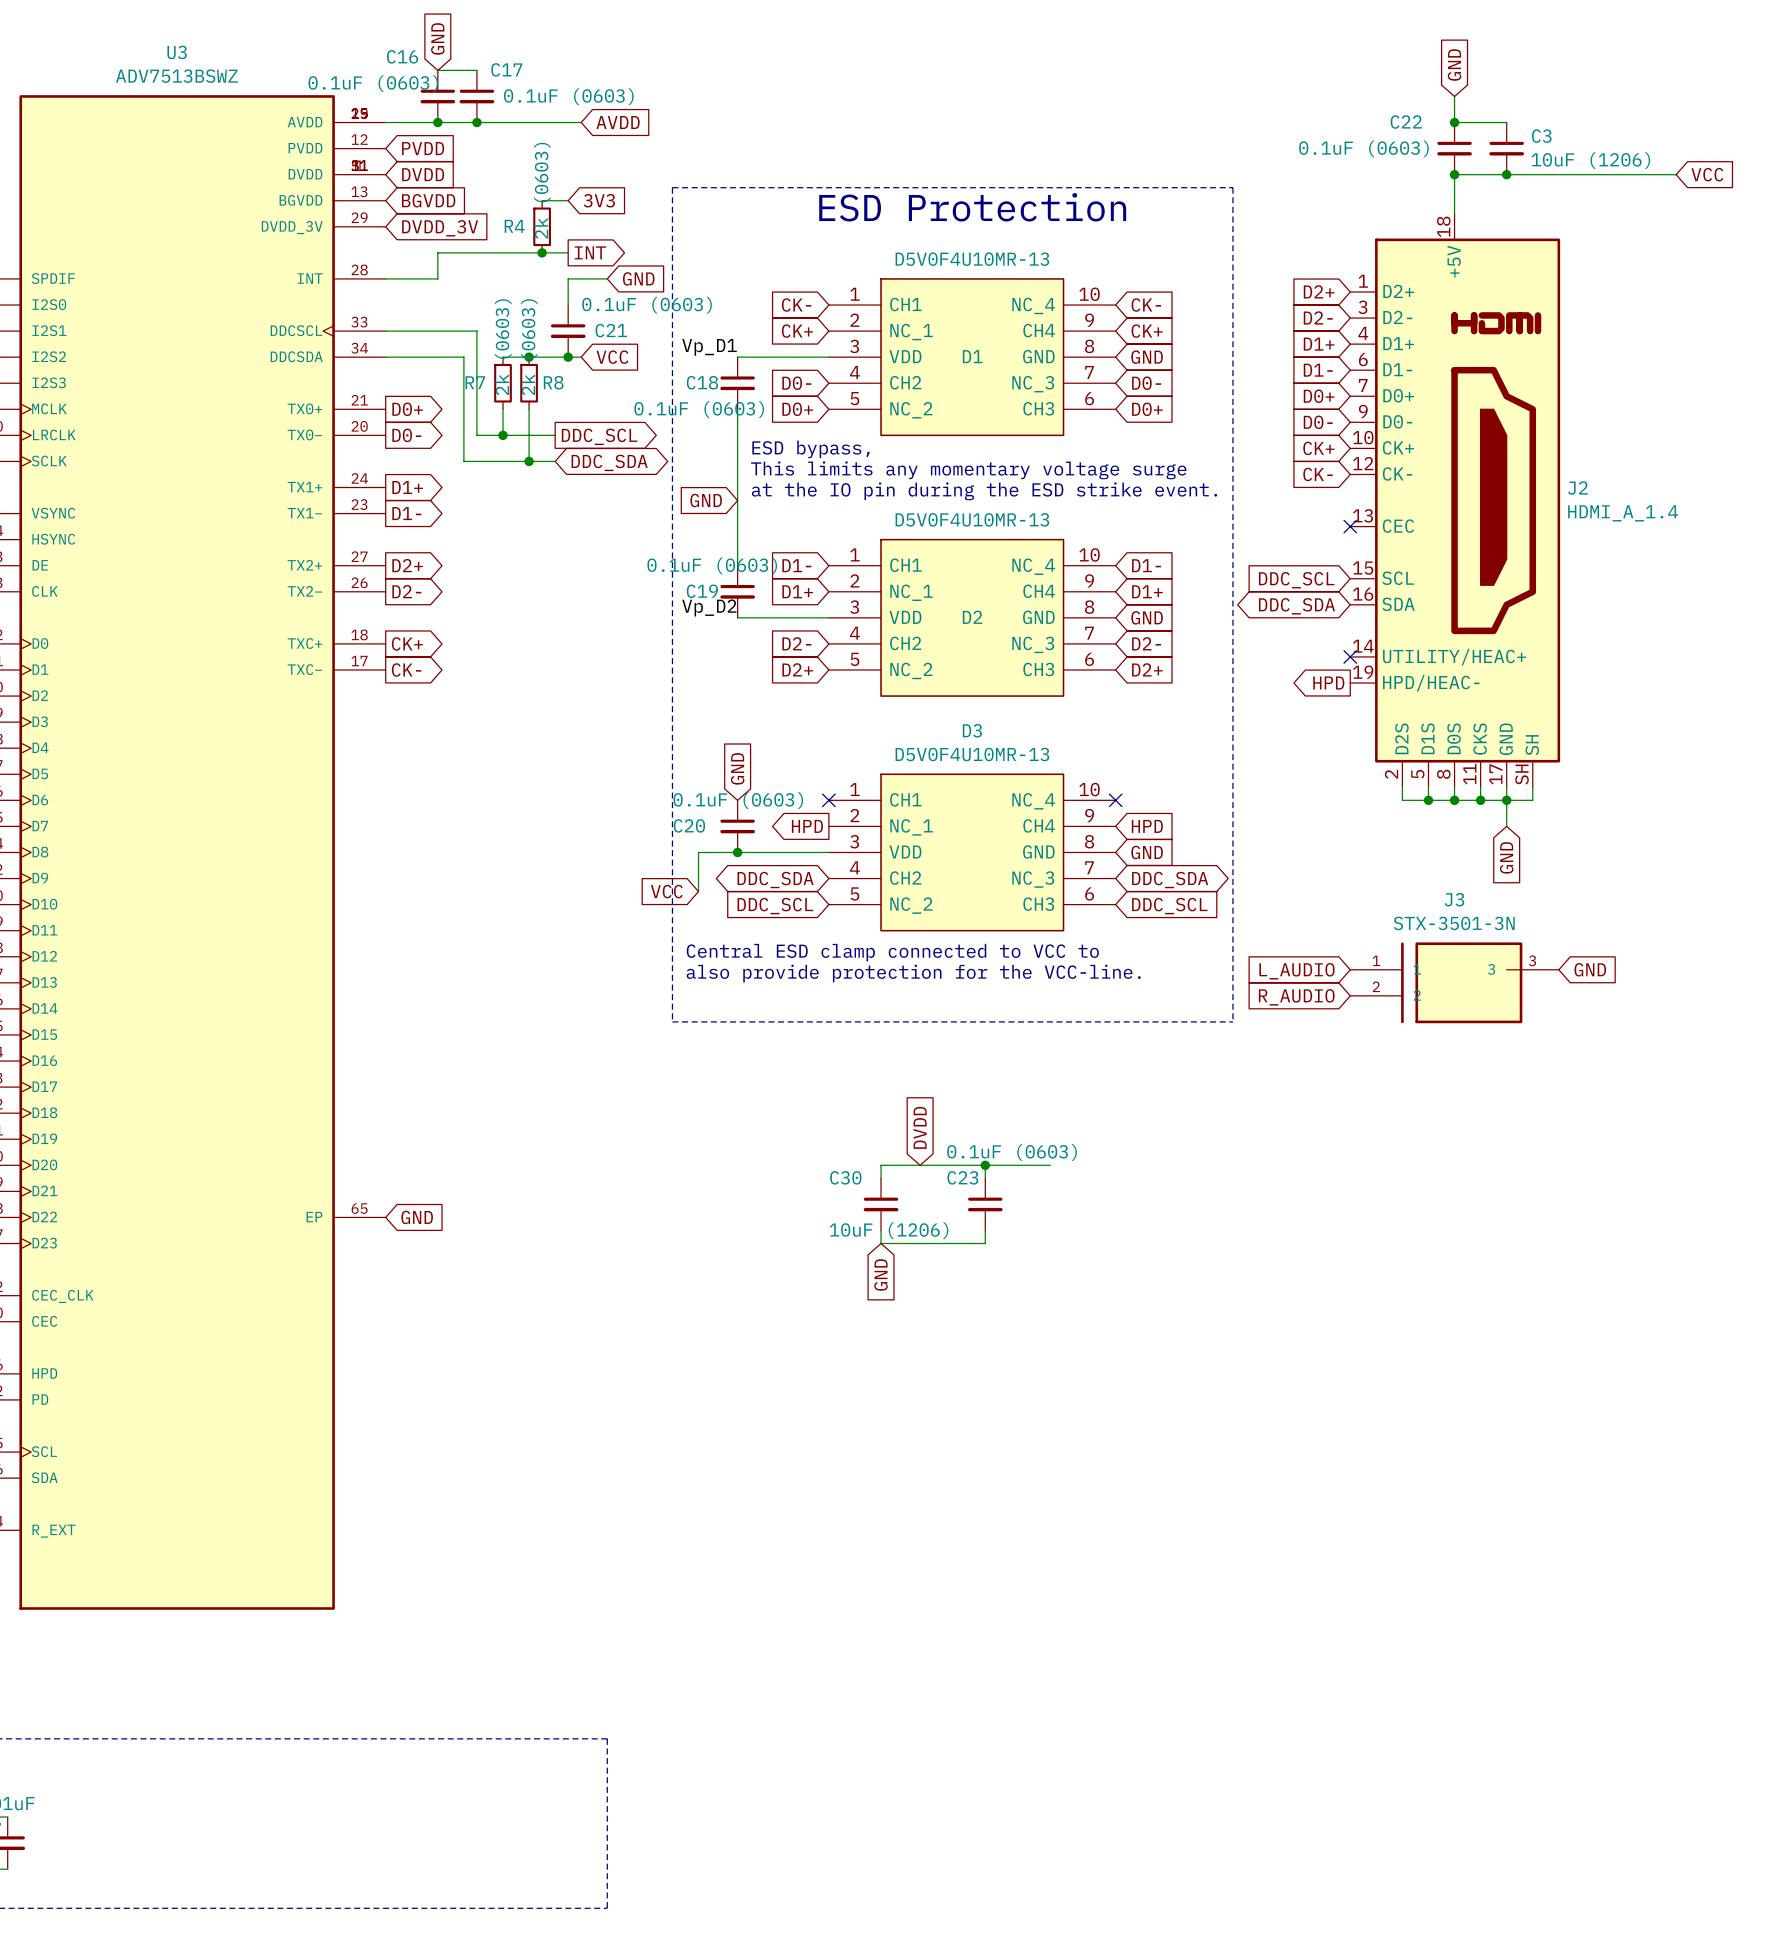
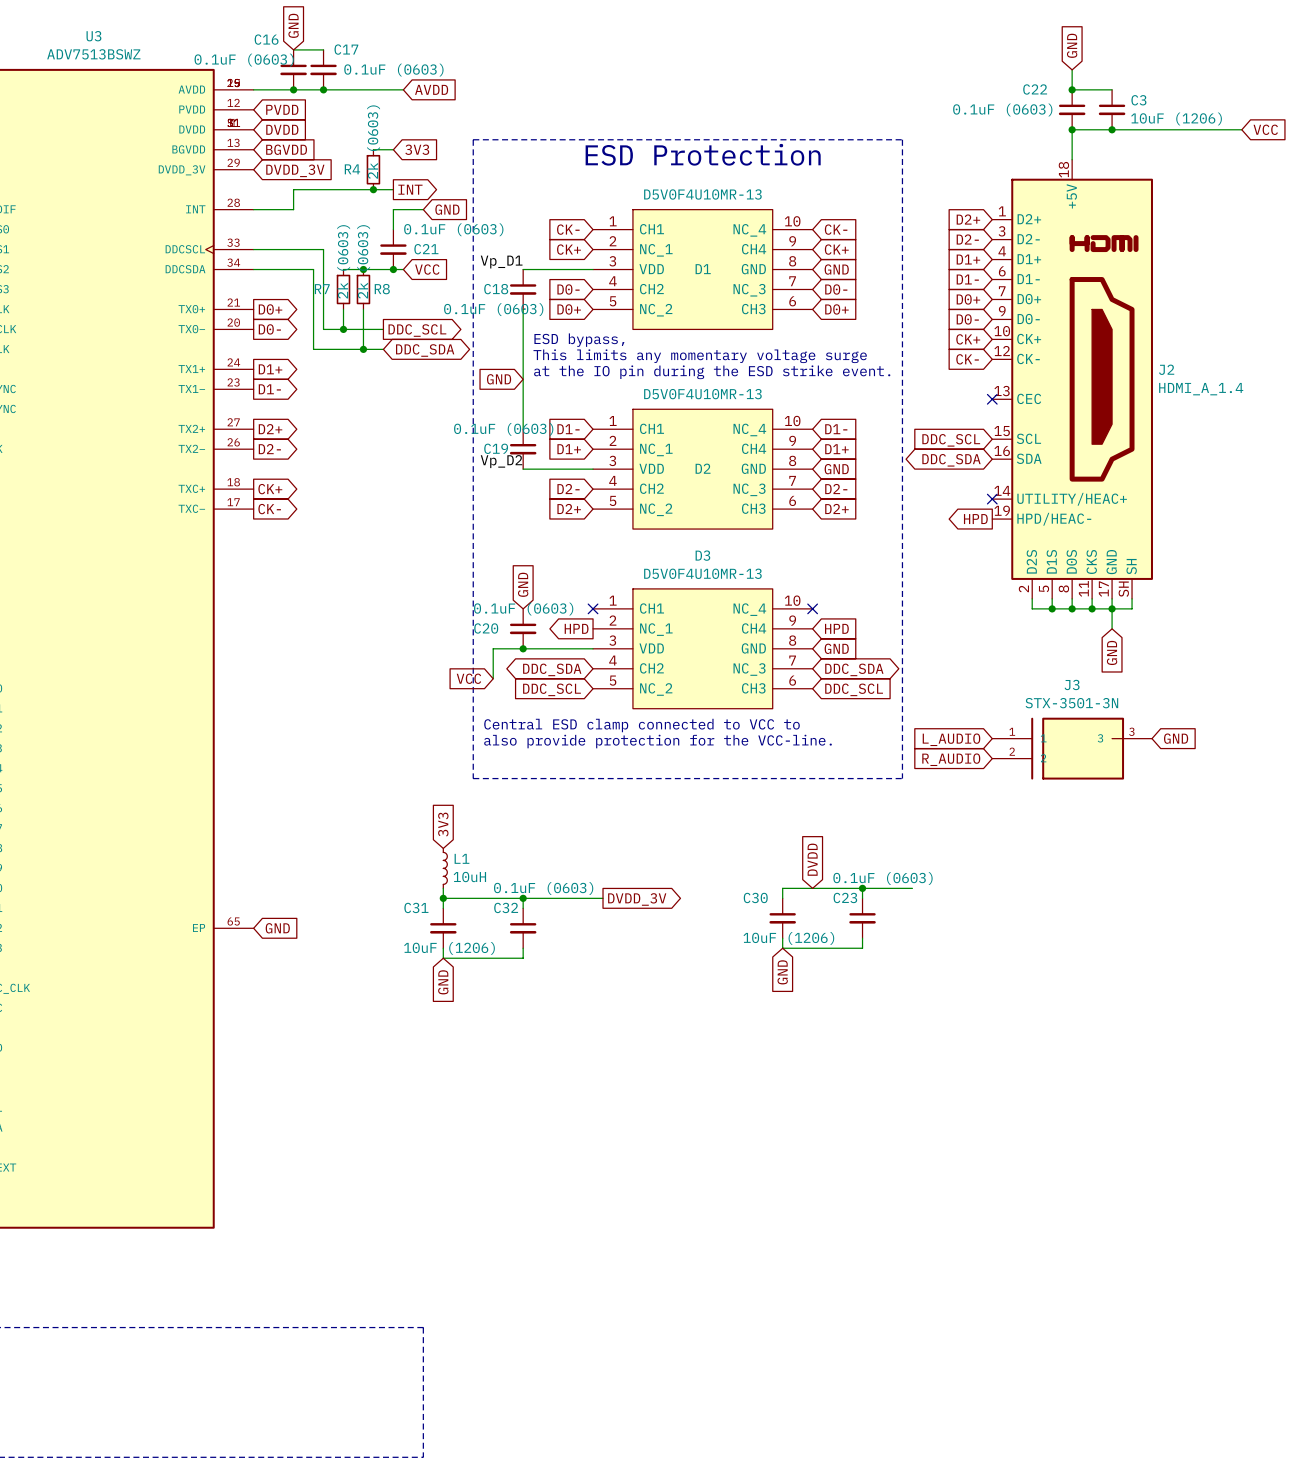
global label: none -> 3V3 (443, 824)
global label position: DVDD (920, 1127) -> DVDD (812, 859)
L1: none -> 10uH (445, 868)
wire: none -> (443, 888) (443, 908)
wire: (985, 1165) (985, 1178) -> (862, 888) (862, 898)
junction: (985, 1165) -> none
wire: (1050, 1165) (881, 1165) (881, 1178) -> (912, 888) (782, 888) (782, 898)
junction: none -> (862, 888)
wire: none -> (443, 898) (603, 898)
junction: none -> (443, 898)
wire: none -> (523, 898) (523, 908)
junction: none -> (523, 898)
global label: none -> DVDD_3V (637, 899)
C30 position: (881, 1204) -> (782, 918)
C23 position: (985, 1204) -> (862, 918)
C31: none -> 10uF (1206) (443, 928)
C32: none -> 0.1uF (0603) (523, 928)
wire: (881, 1230) (881, 1243) (985, 1243) (985, 1230) -> (782, 938) (782, 948) (862, 948) (862, 938)
wire: none -> (443, 948) (443, 958) (523, 958) (523, 948)
global label: GND (881, 1274) -> none
global label: none -> GND (782, 972)
global label: none -> GND (443, 982)

